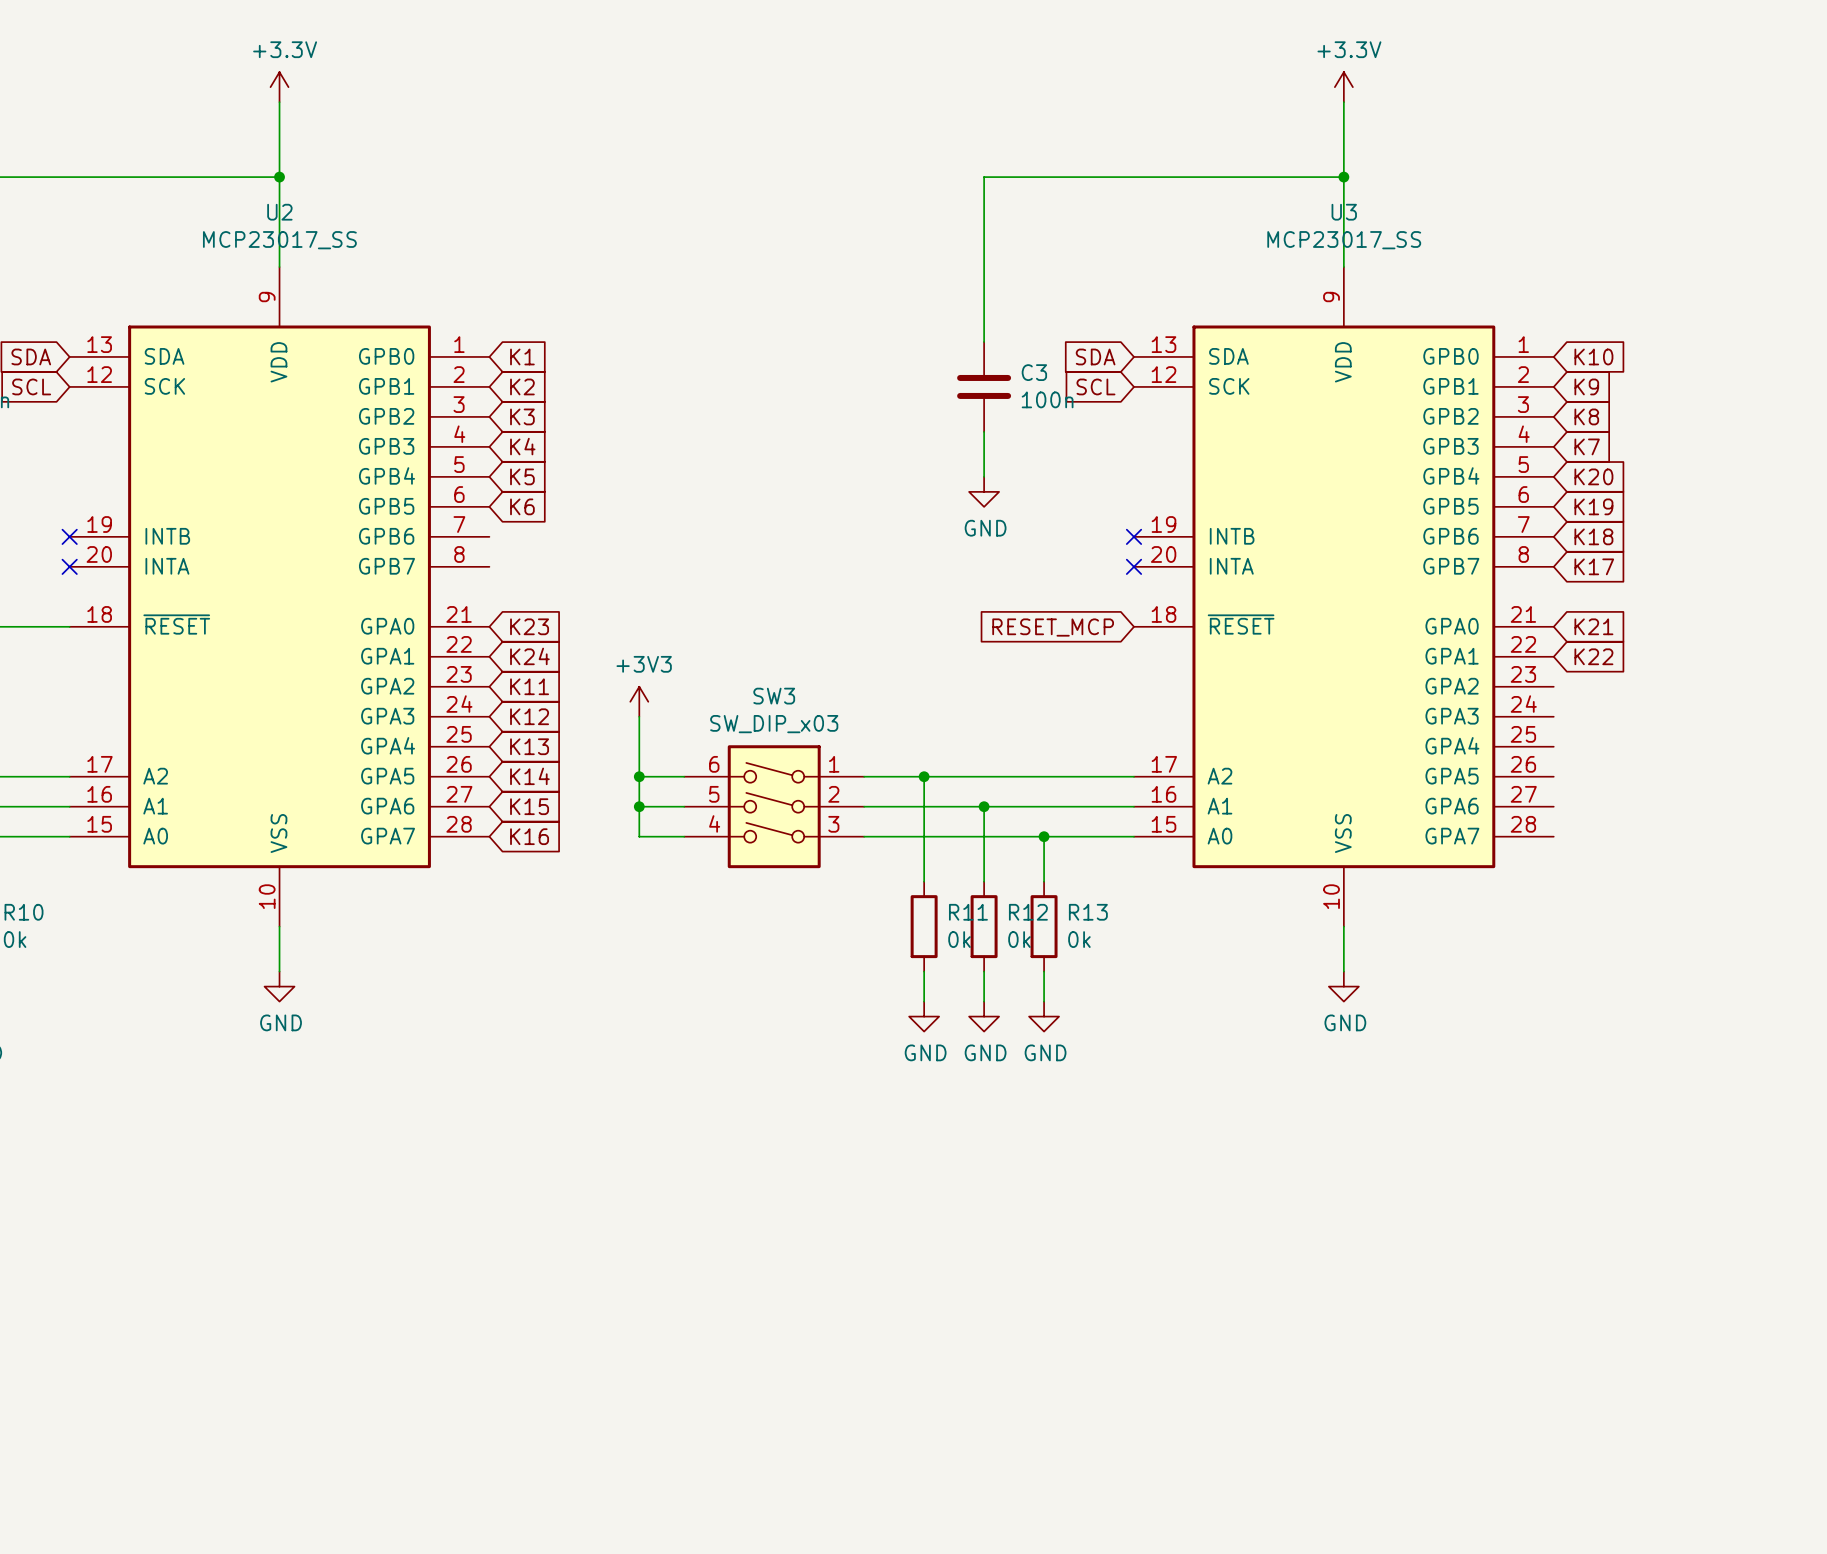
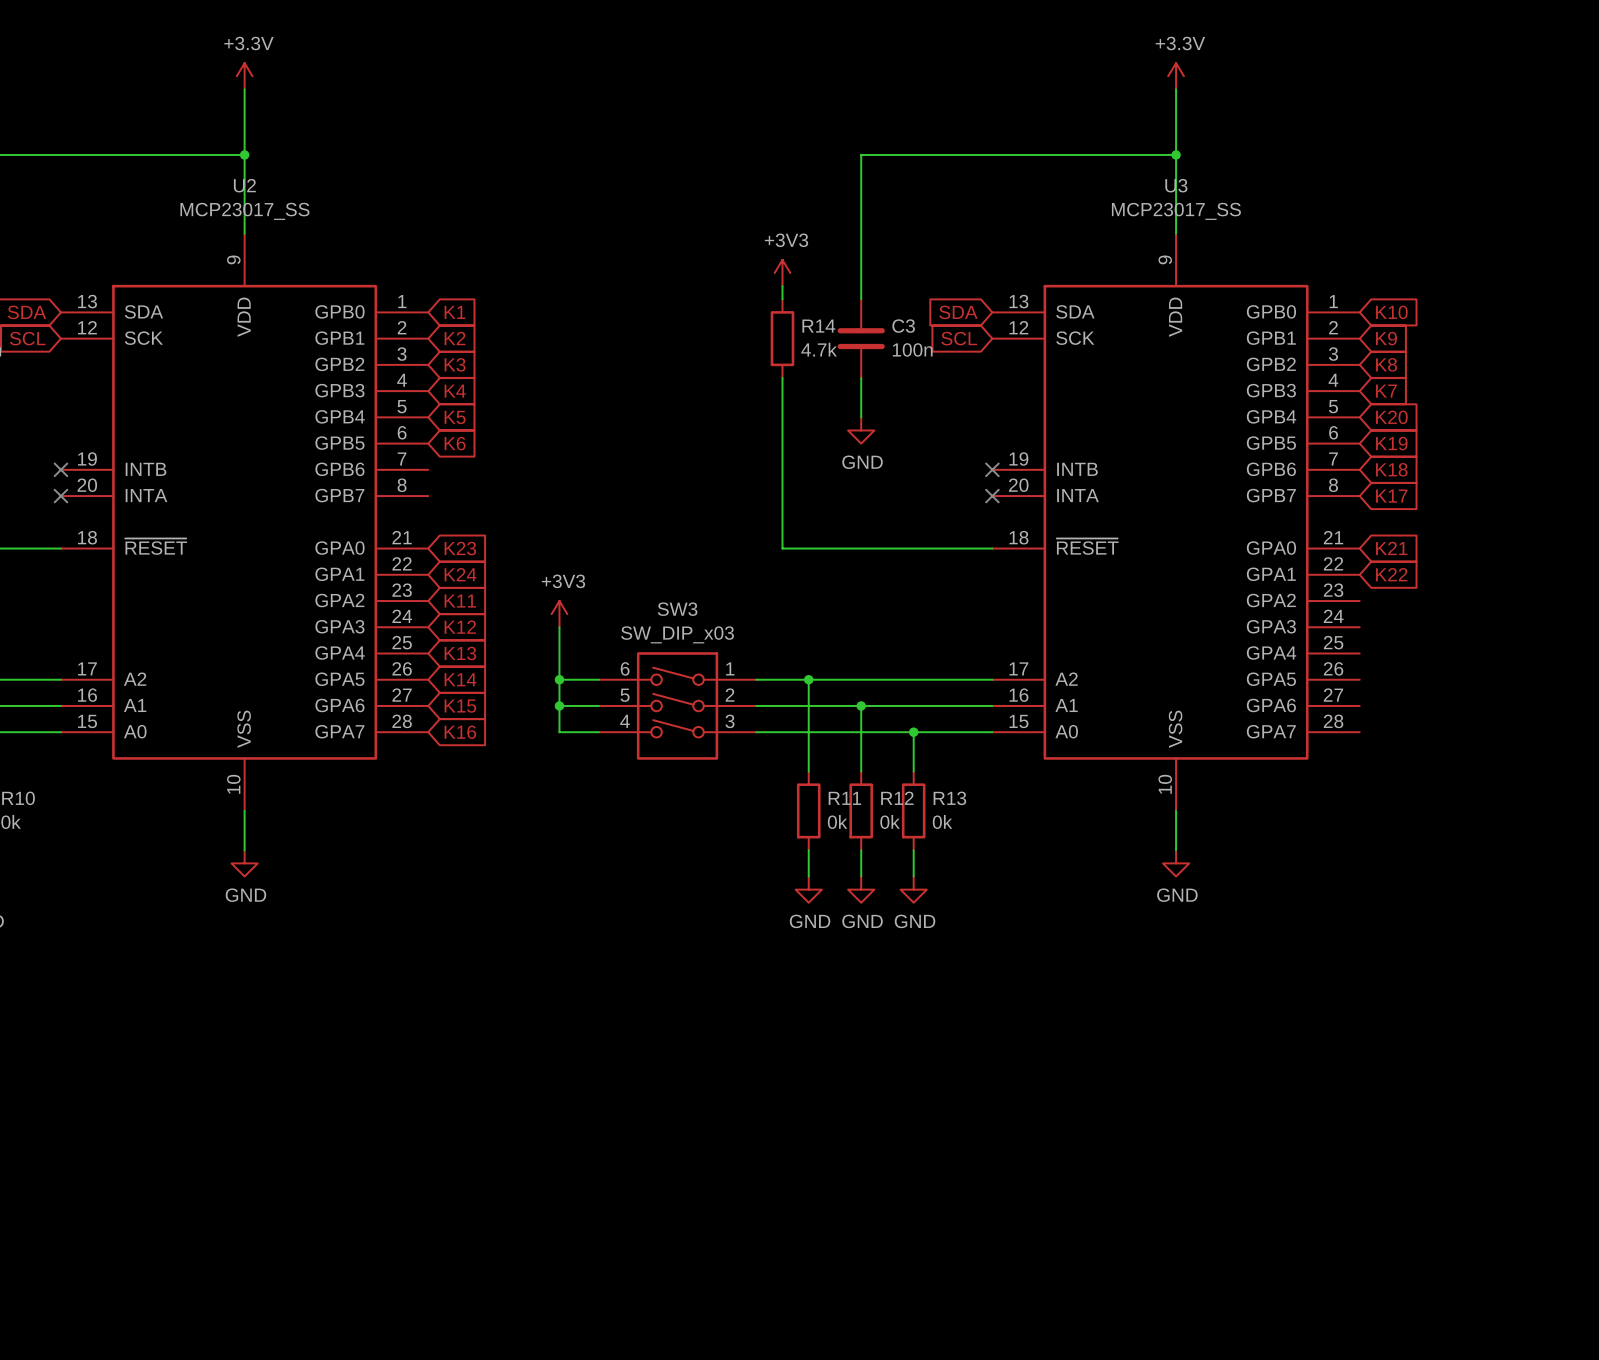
power symbol: none -> +3V3 (782, 273)
wire: none -> (782, 286) (782, 299)
R14: none -> 4.7k (782, 338)
wire: none -> (782, 377) (782, 548) (992, 548)
global label: RESET_MCP (1053, 627) -> none

